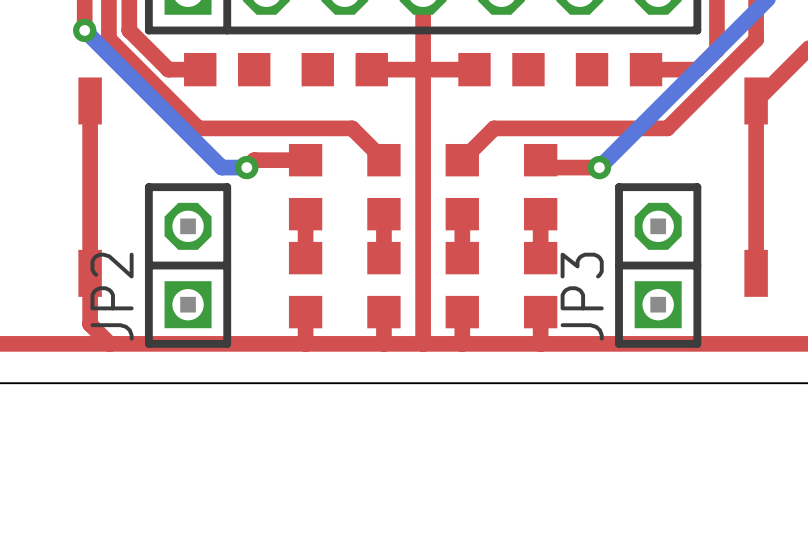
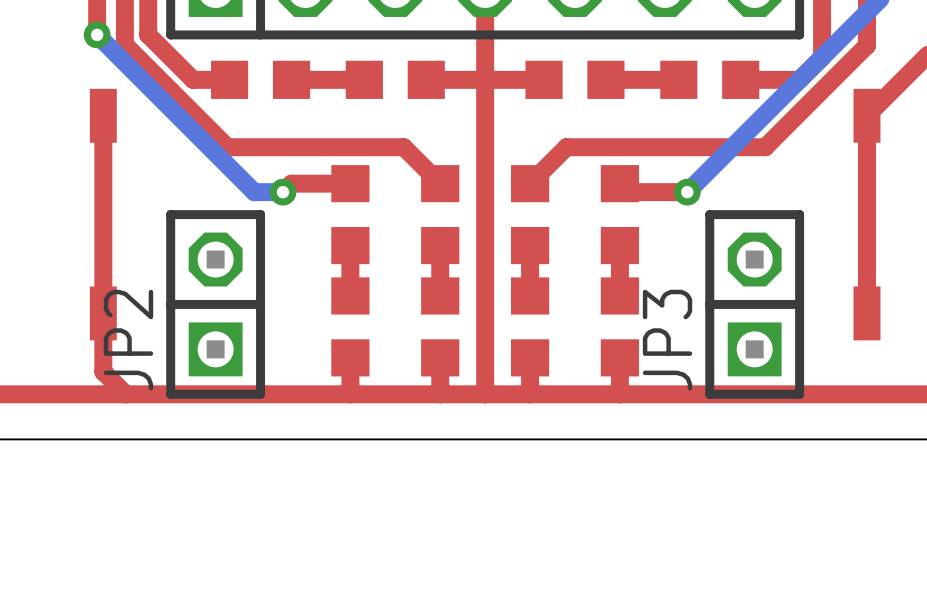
top track: none -> (364, 79) (291, 79)
top track: none -> (678, 79) (605, 79)

